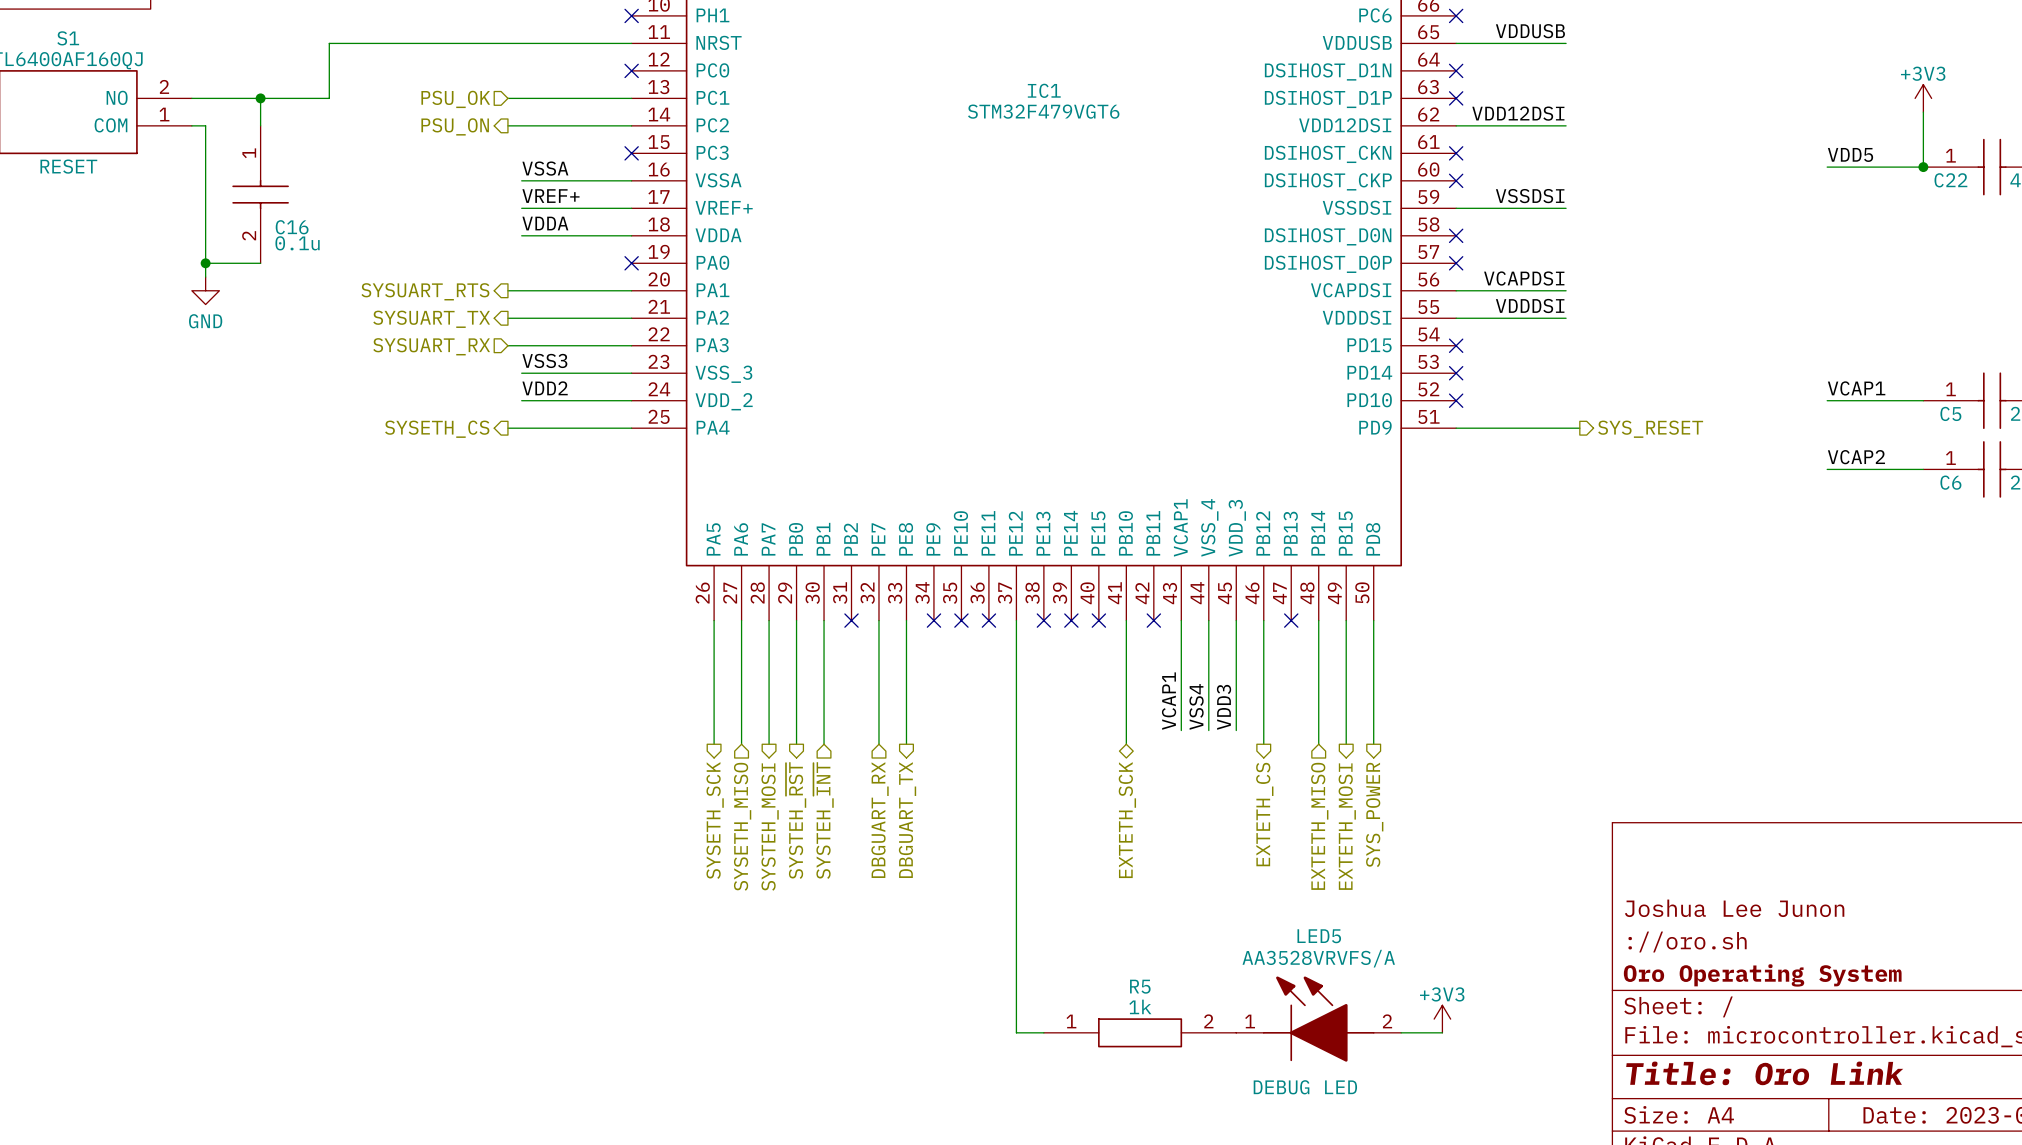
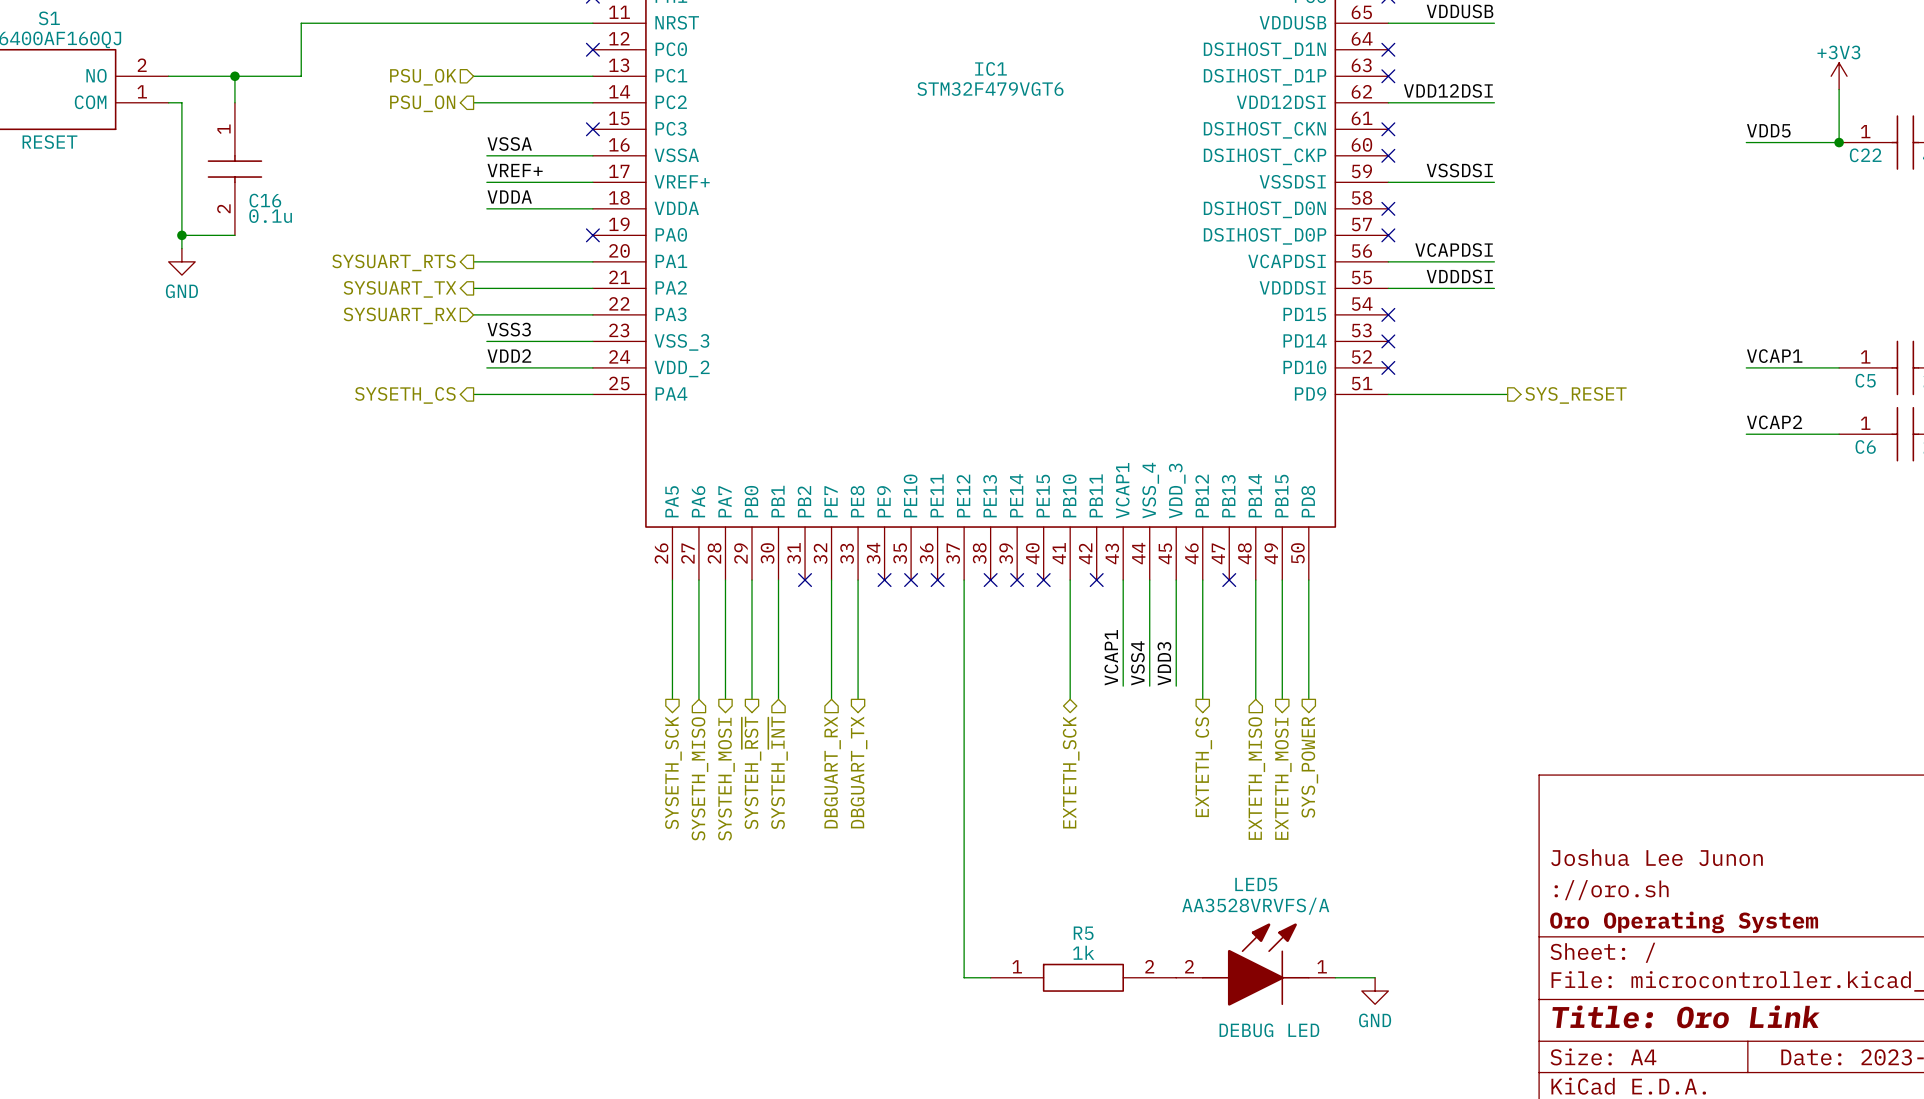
LED5 flip: as is (1318, 1019) -> left-right (1255, 964)
power symbol: +3V3 (1442, 1019) -> none
power symbol: none -> GND (1375, 991)

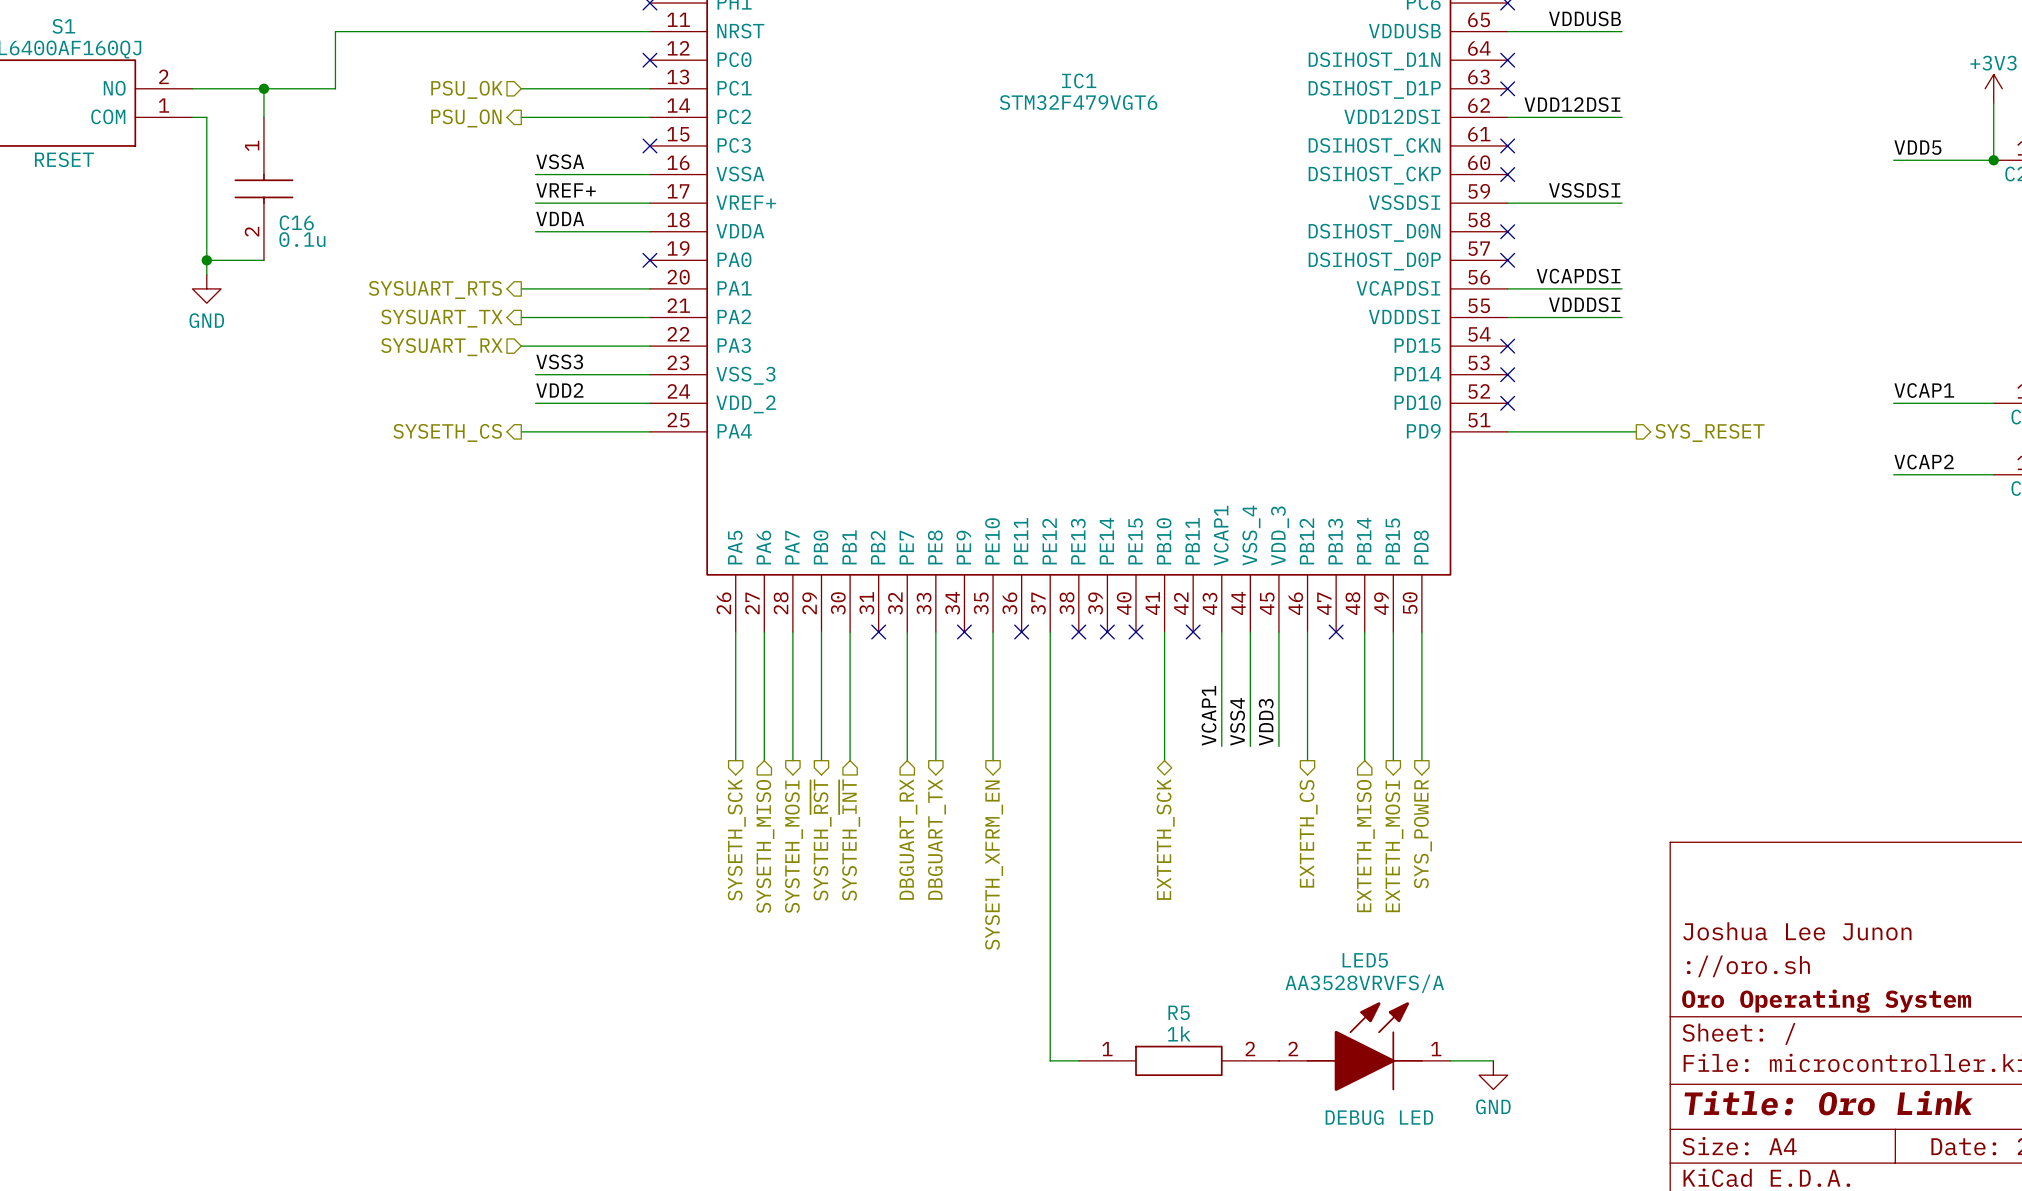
wire: none -> (993, 632) (993, 760)
no-connect mark: (911, 580) -> none
hierarchical label: none -> SYSETH_XFRM_EN (994, 865)

